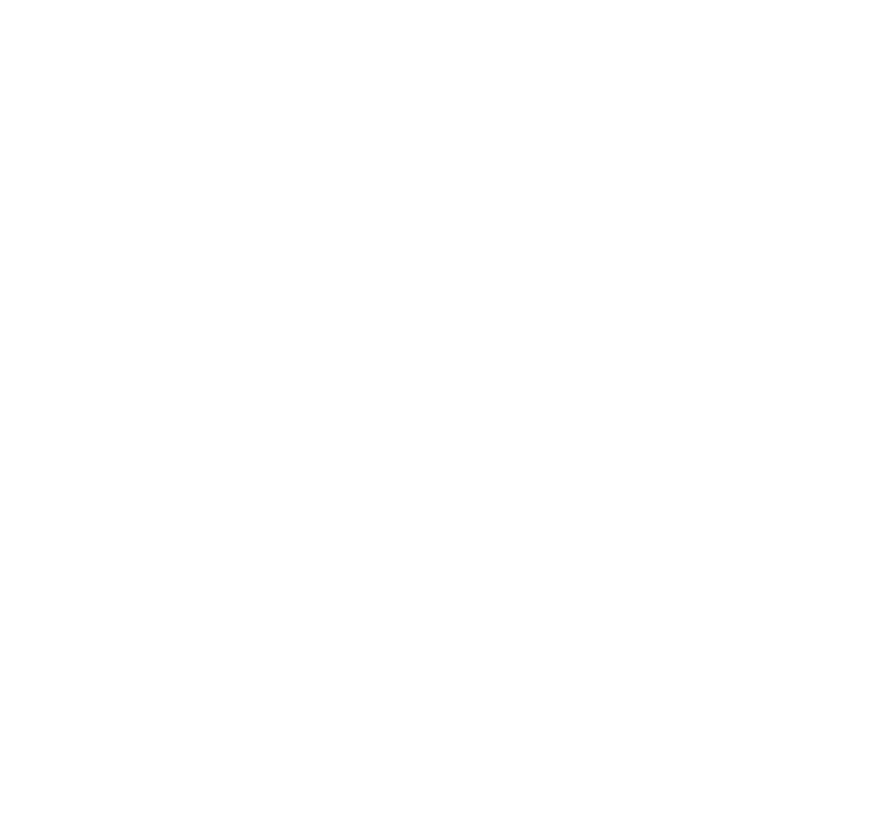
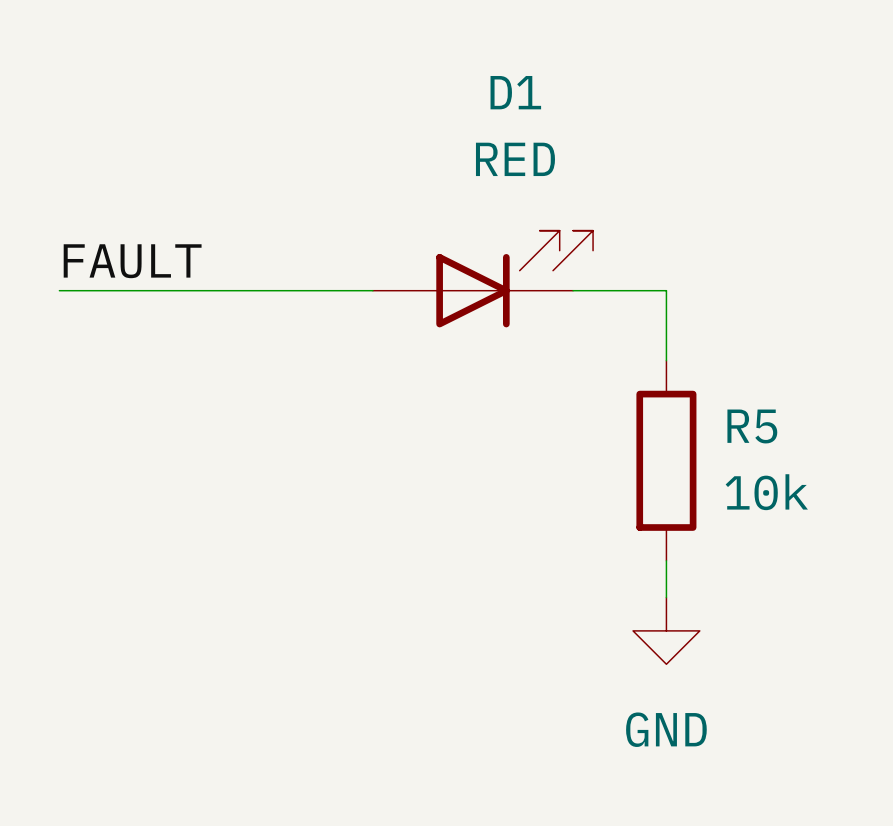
label: none -> FAULT (132, 261)
D1: none -> RED (482, 279)
wire: none -> (59, 290) (372, 290)
wire: none -> (573, 290) (666, 290) (666, 360)
R5: none -> 10k (666, 460)
wire: none -> (666, 560) (666, 597)
power symbol: none -> GND (666, 630)

